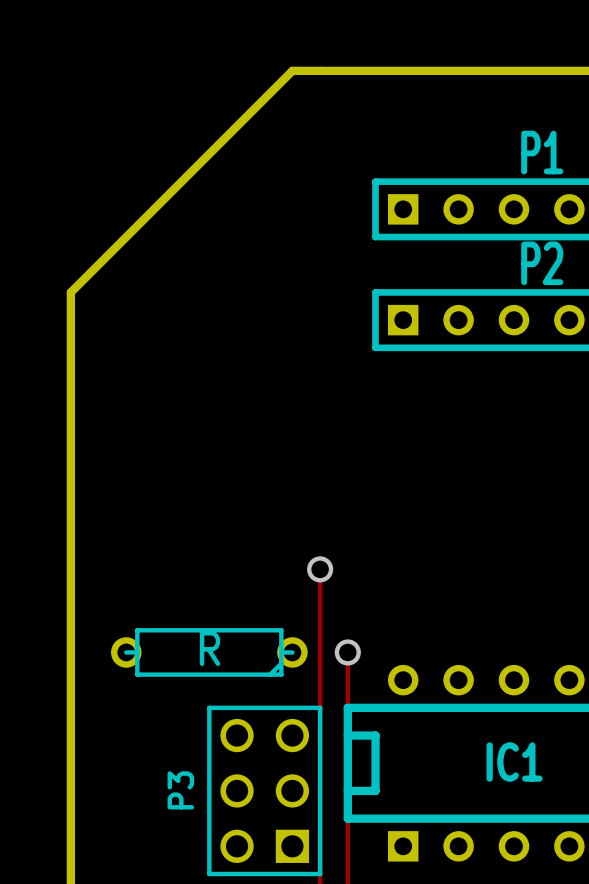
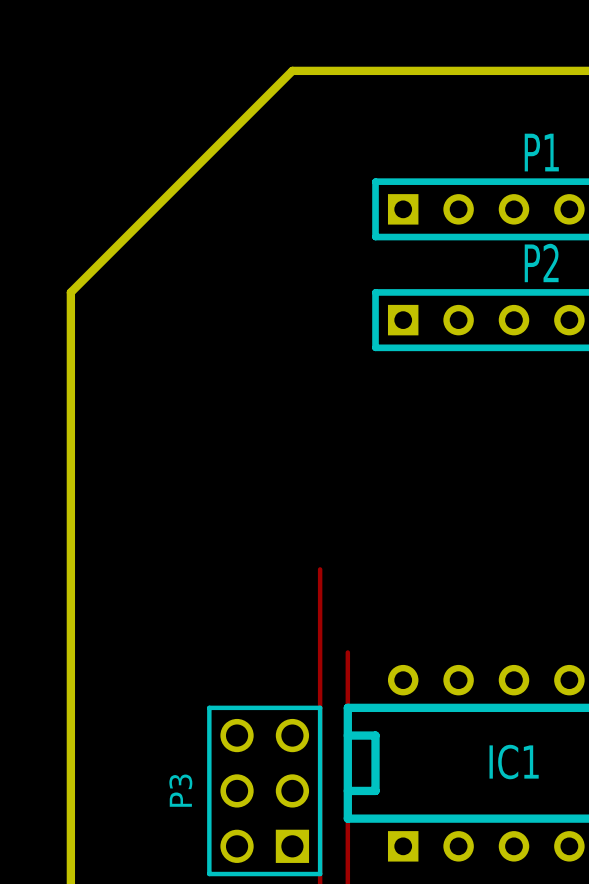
via: (320, 569) -> none
part: R (209, 652) -> none
via: (347, 652) -> none

